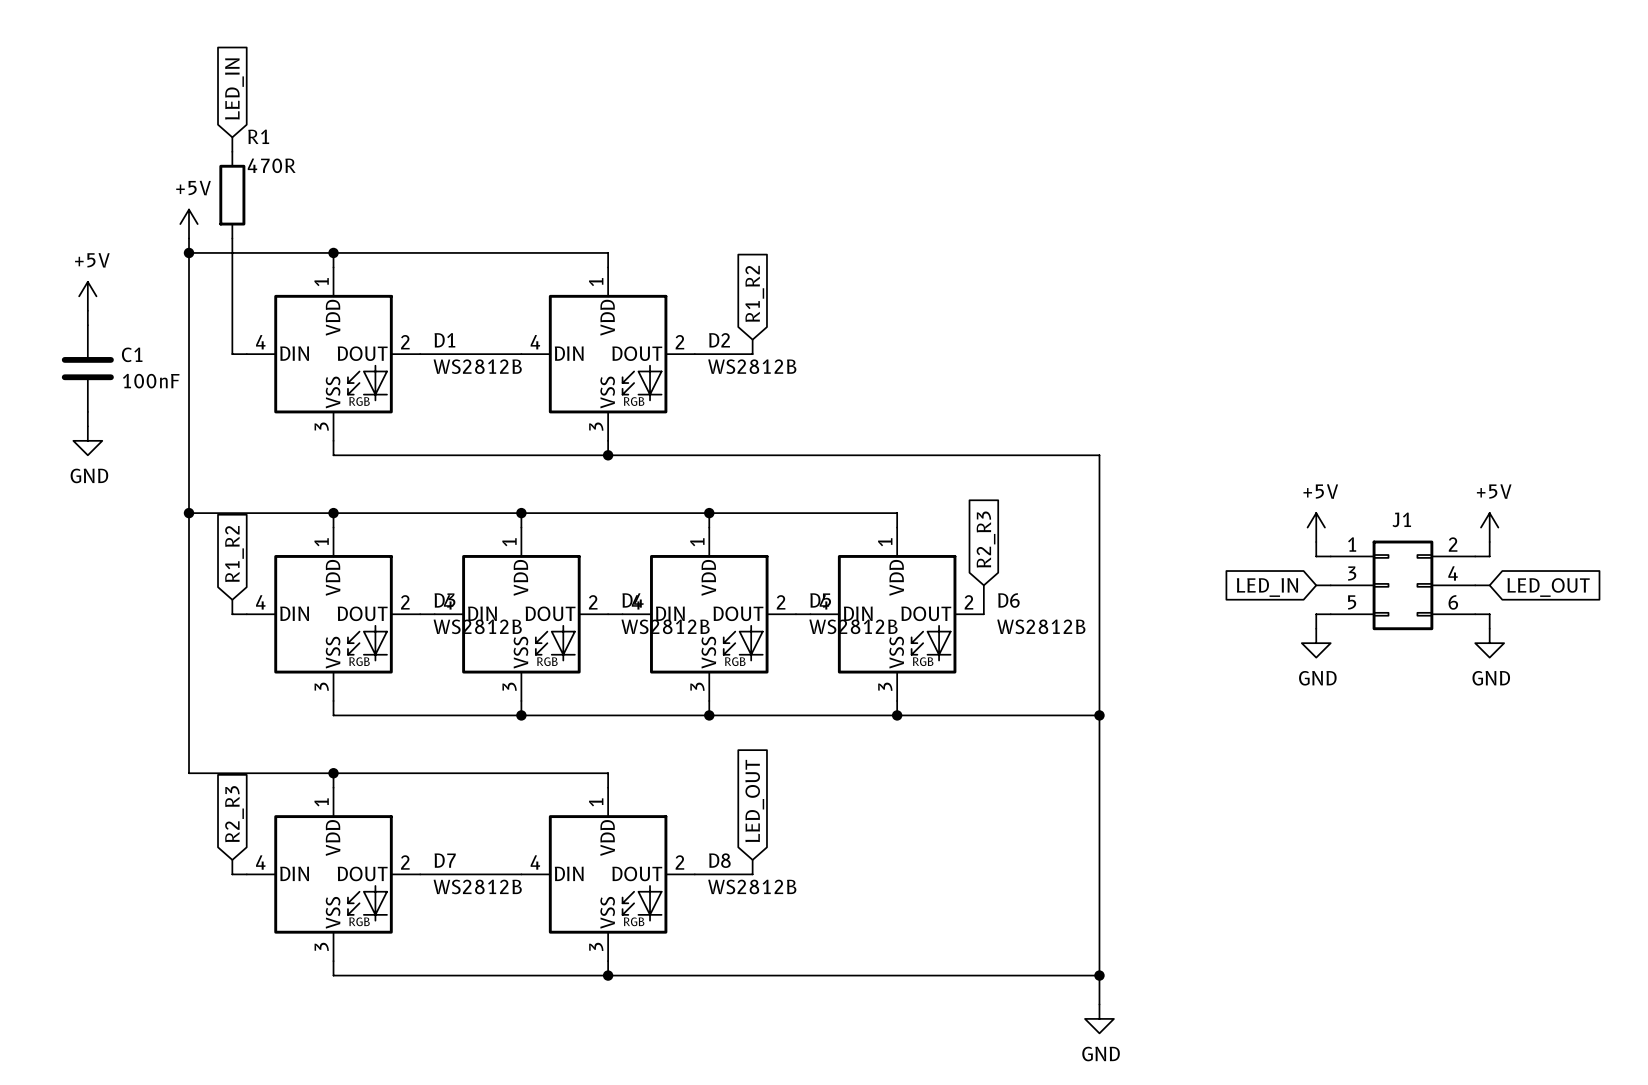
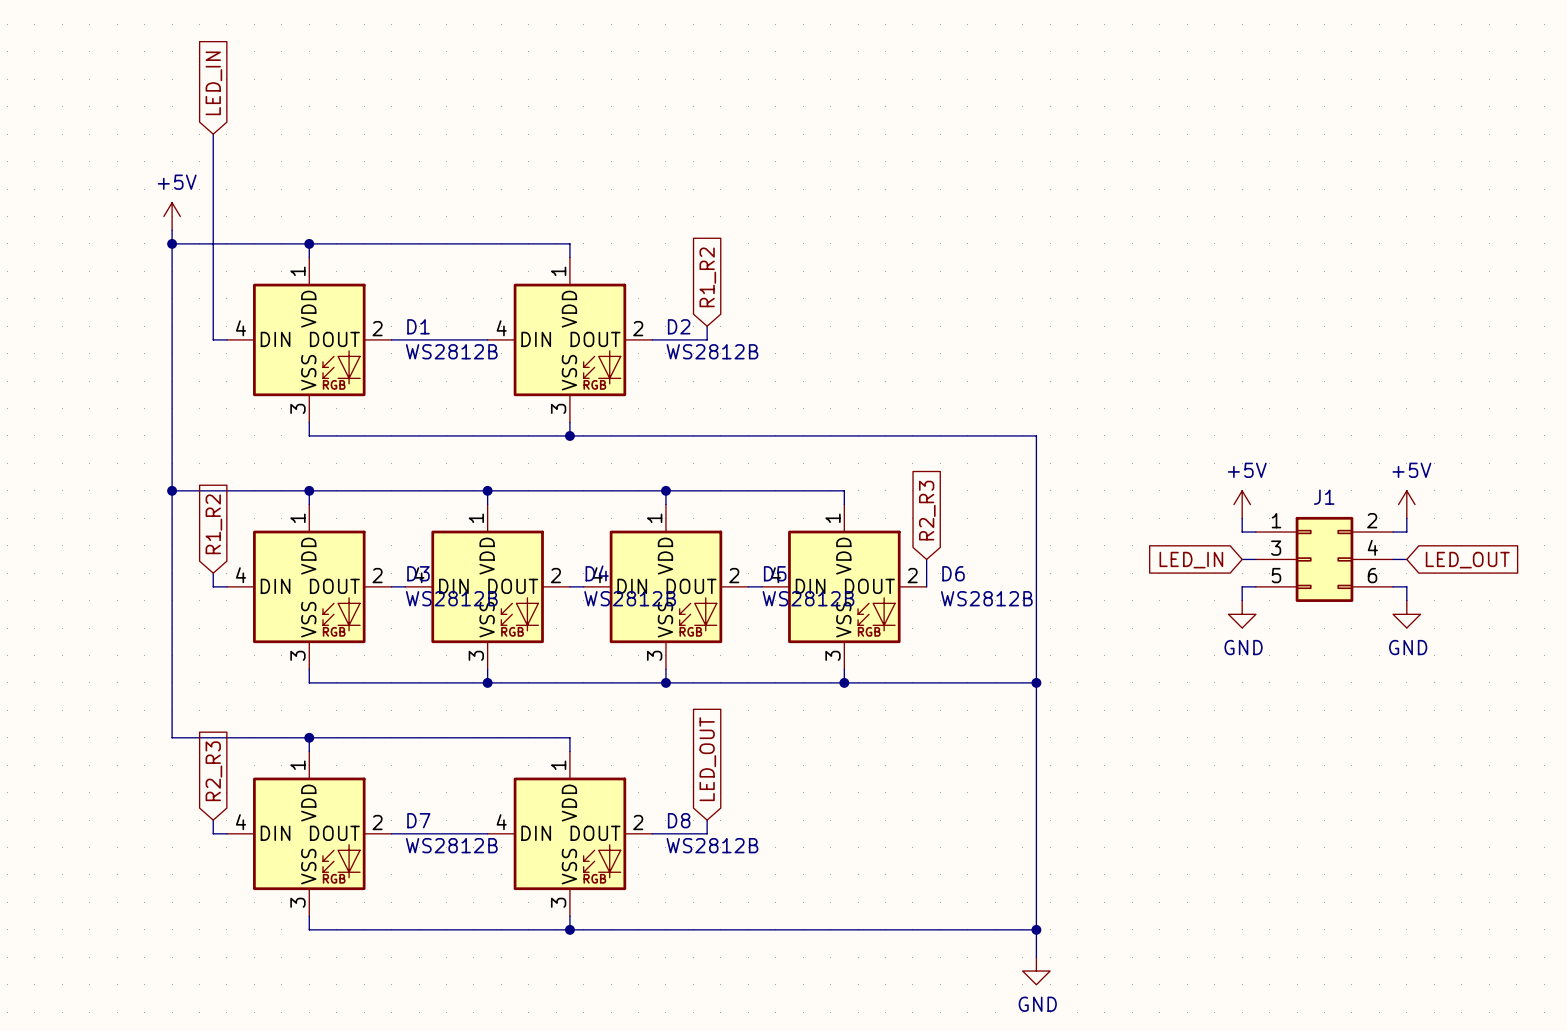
wire: none -> (213, 147) (213, 230)
R1: 470R (232, 195) -> none
power symbol: +5V (87, 296) -> none
wire: (87, 310) (87, 325) -> none
C1: 100nF (87, 368) -> none
wire: (87, 411) (87, 426) -> none
power symbol: GND (87, 440) -> none

